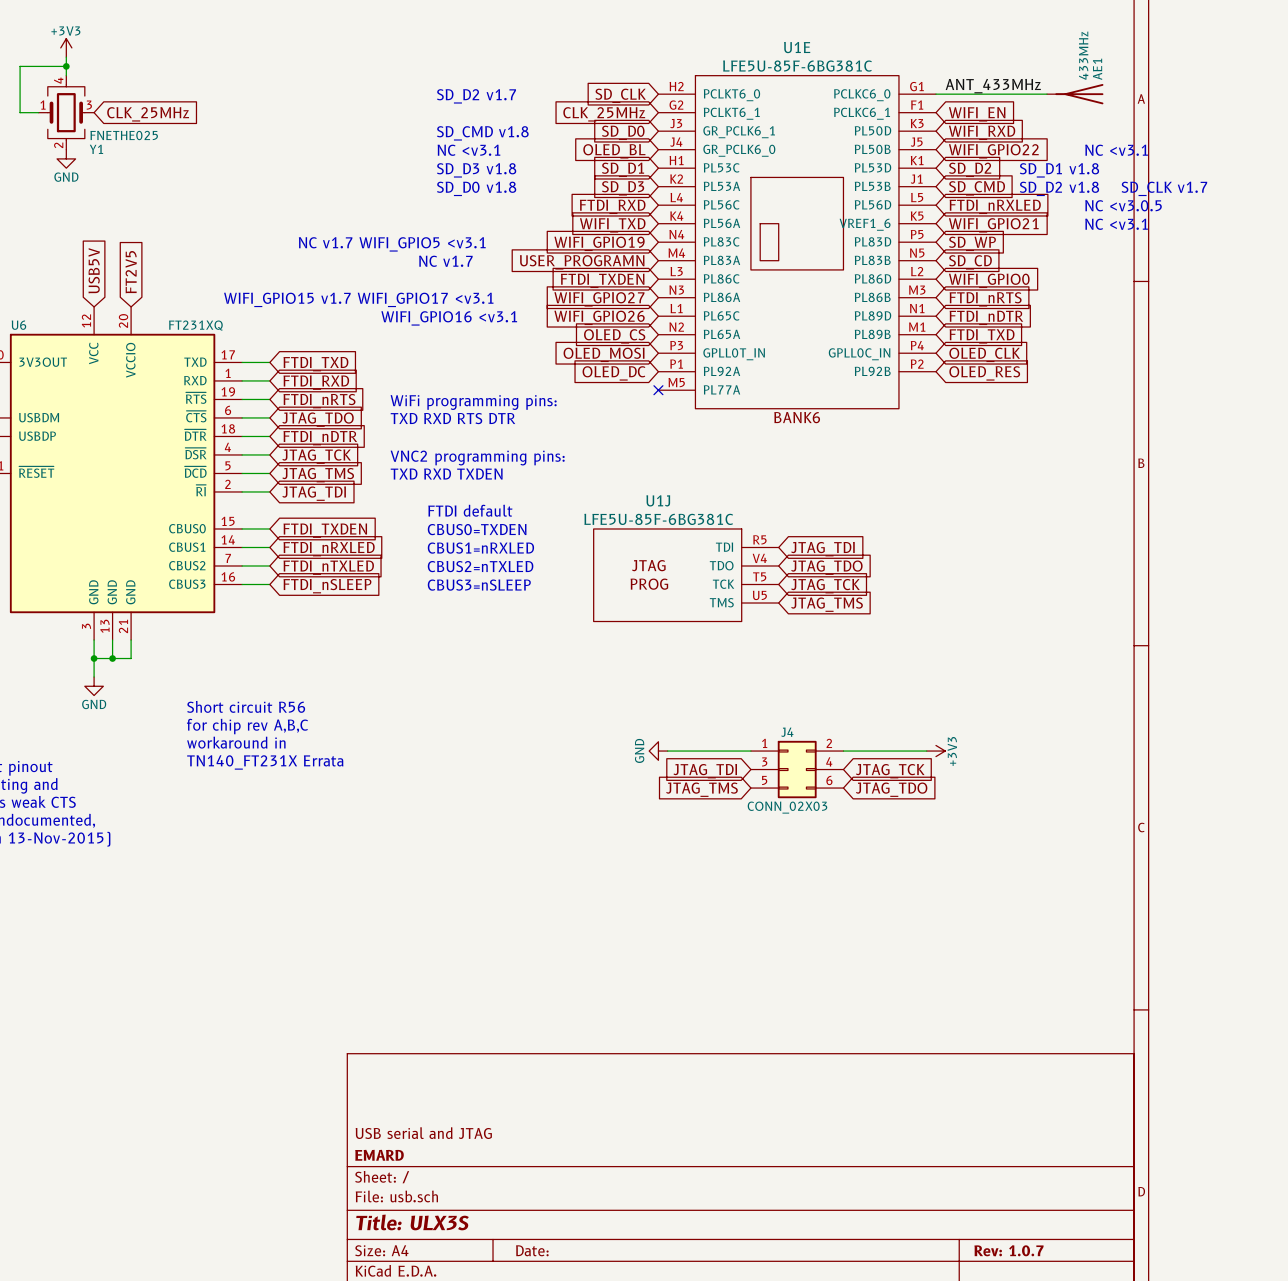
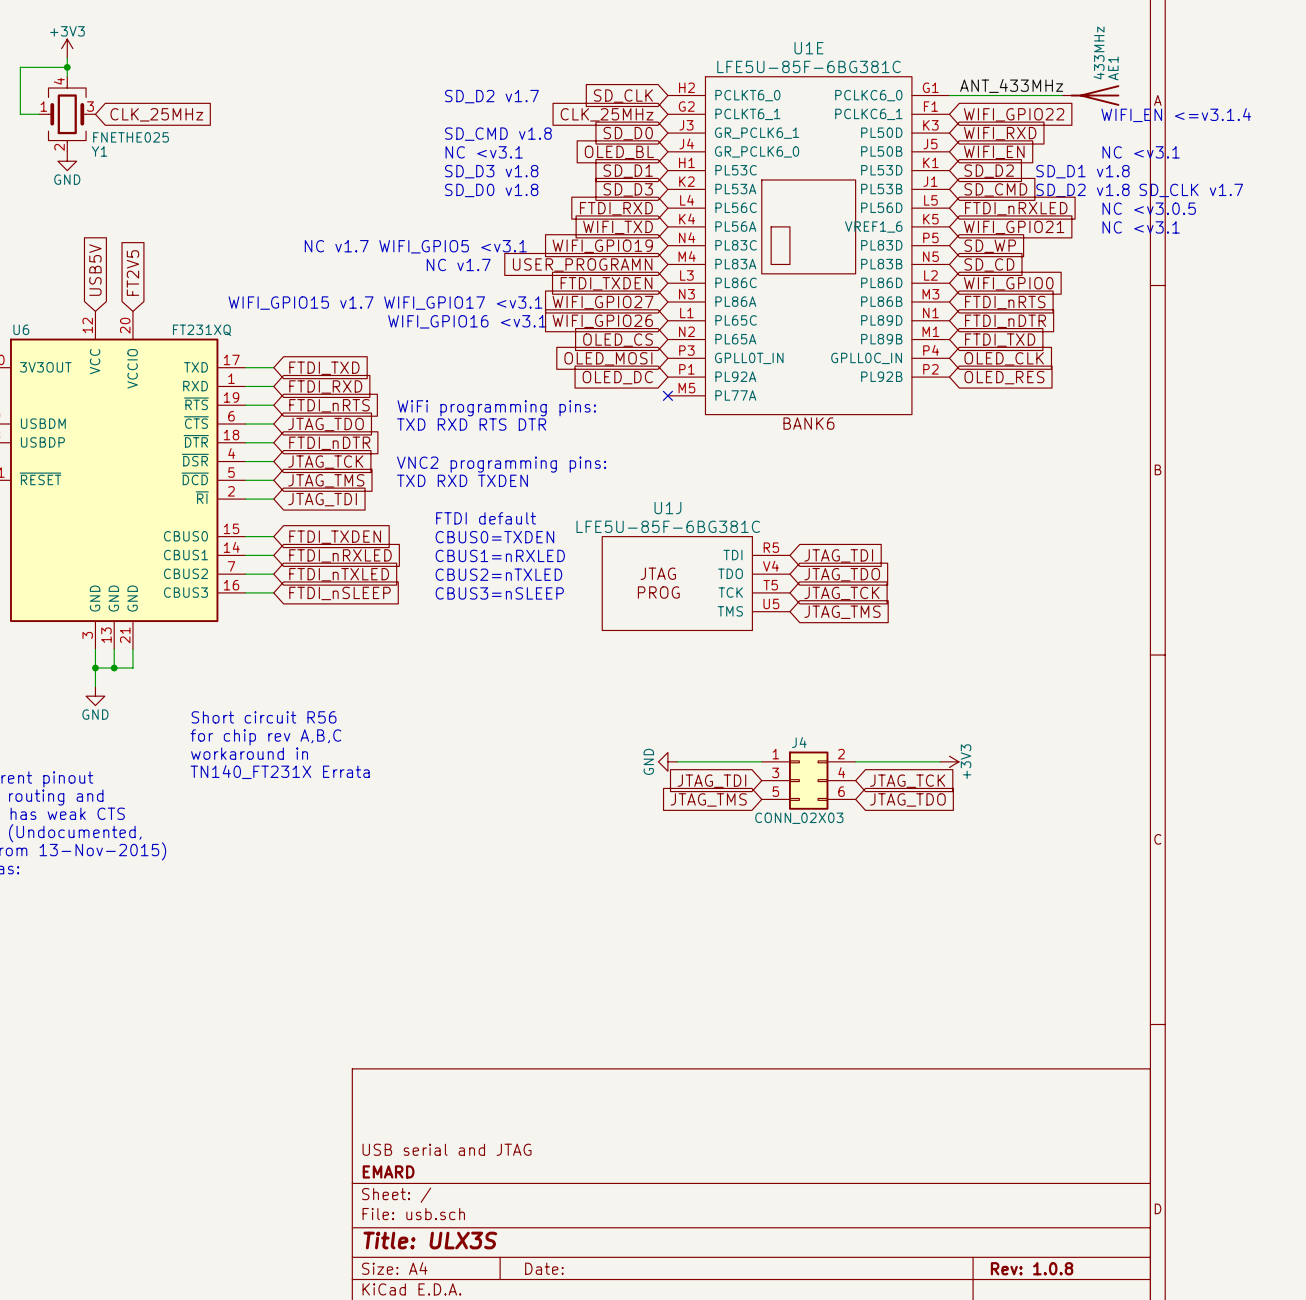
global label: WIFI_EN (977, 114) -> WIFI_GPIO22 (1014, 114)
text: none -> WIFI_EN <=v3.1.4 (1176, 115)
global label: WIFI_GPIO22 (993, 151) -> WIFI_EN (994, 152)
title block: Rev: 1.0.7 (1008, 1250) -> Rev: 1.0.8 (1032, 1268)

